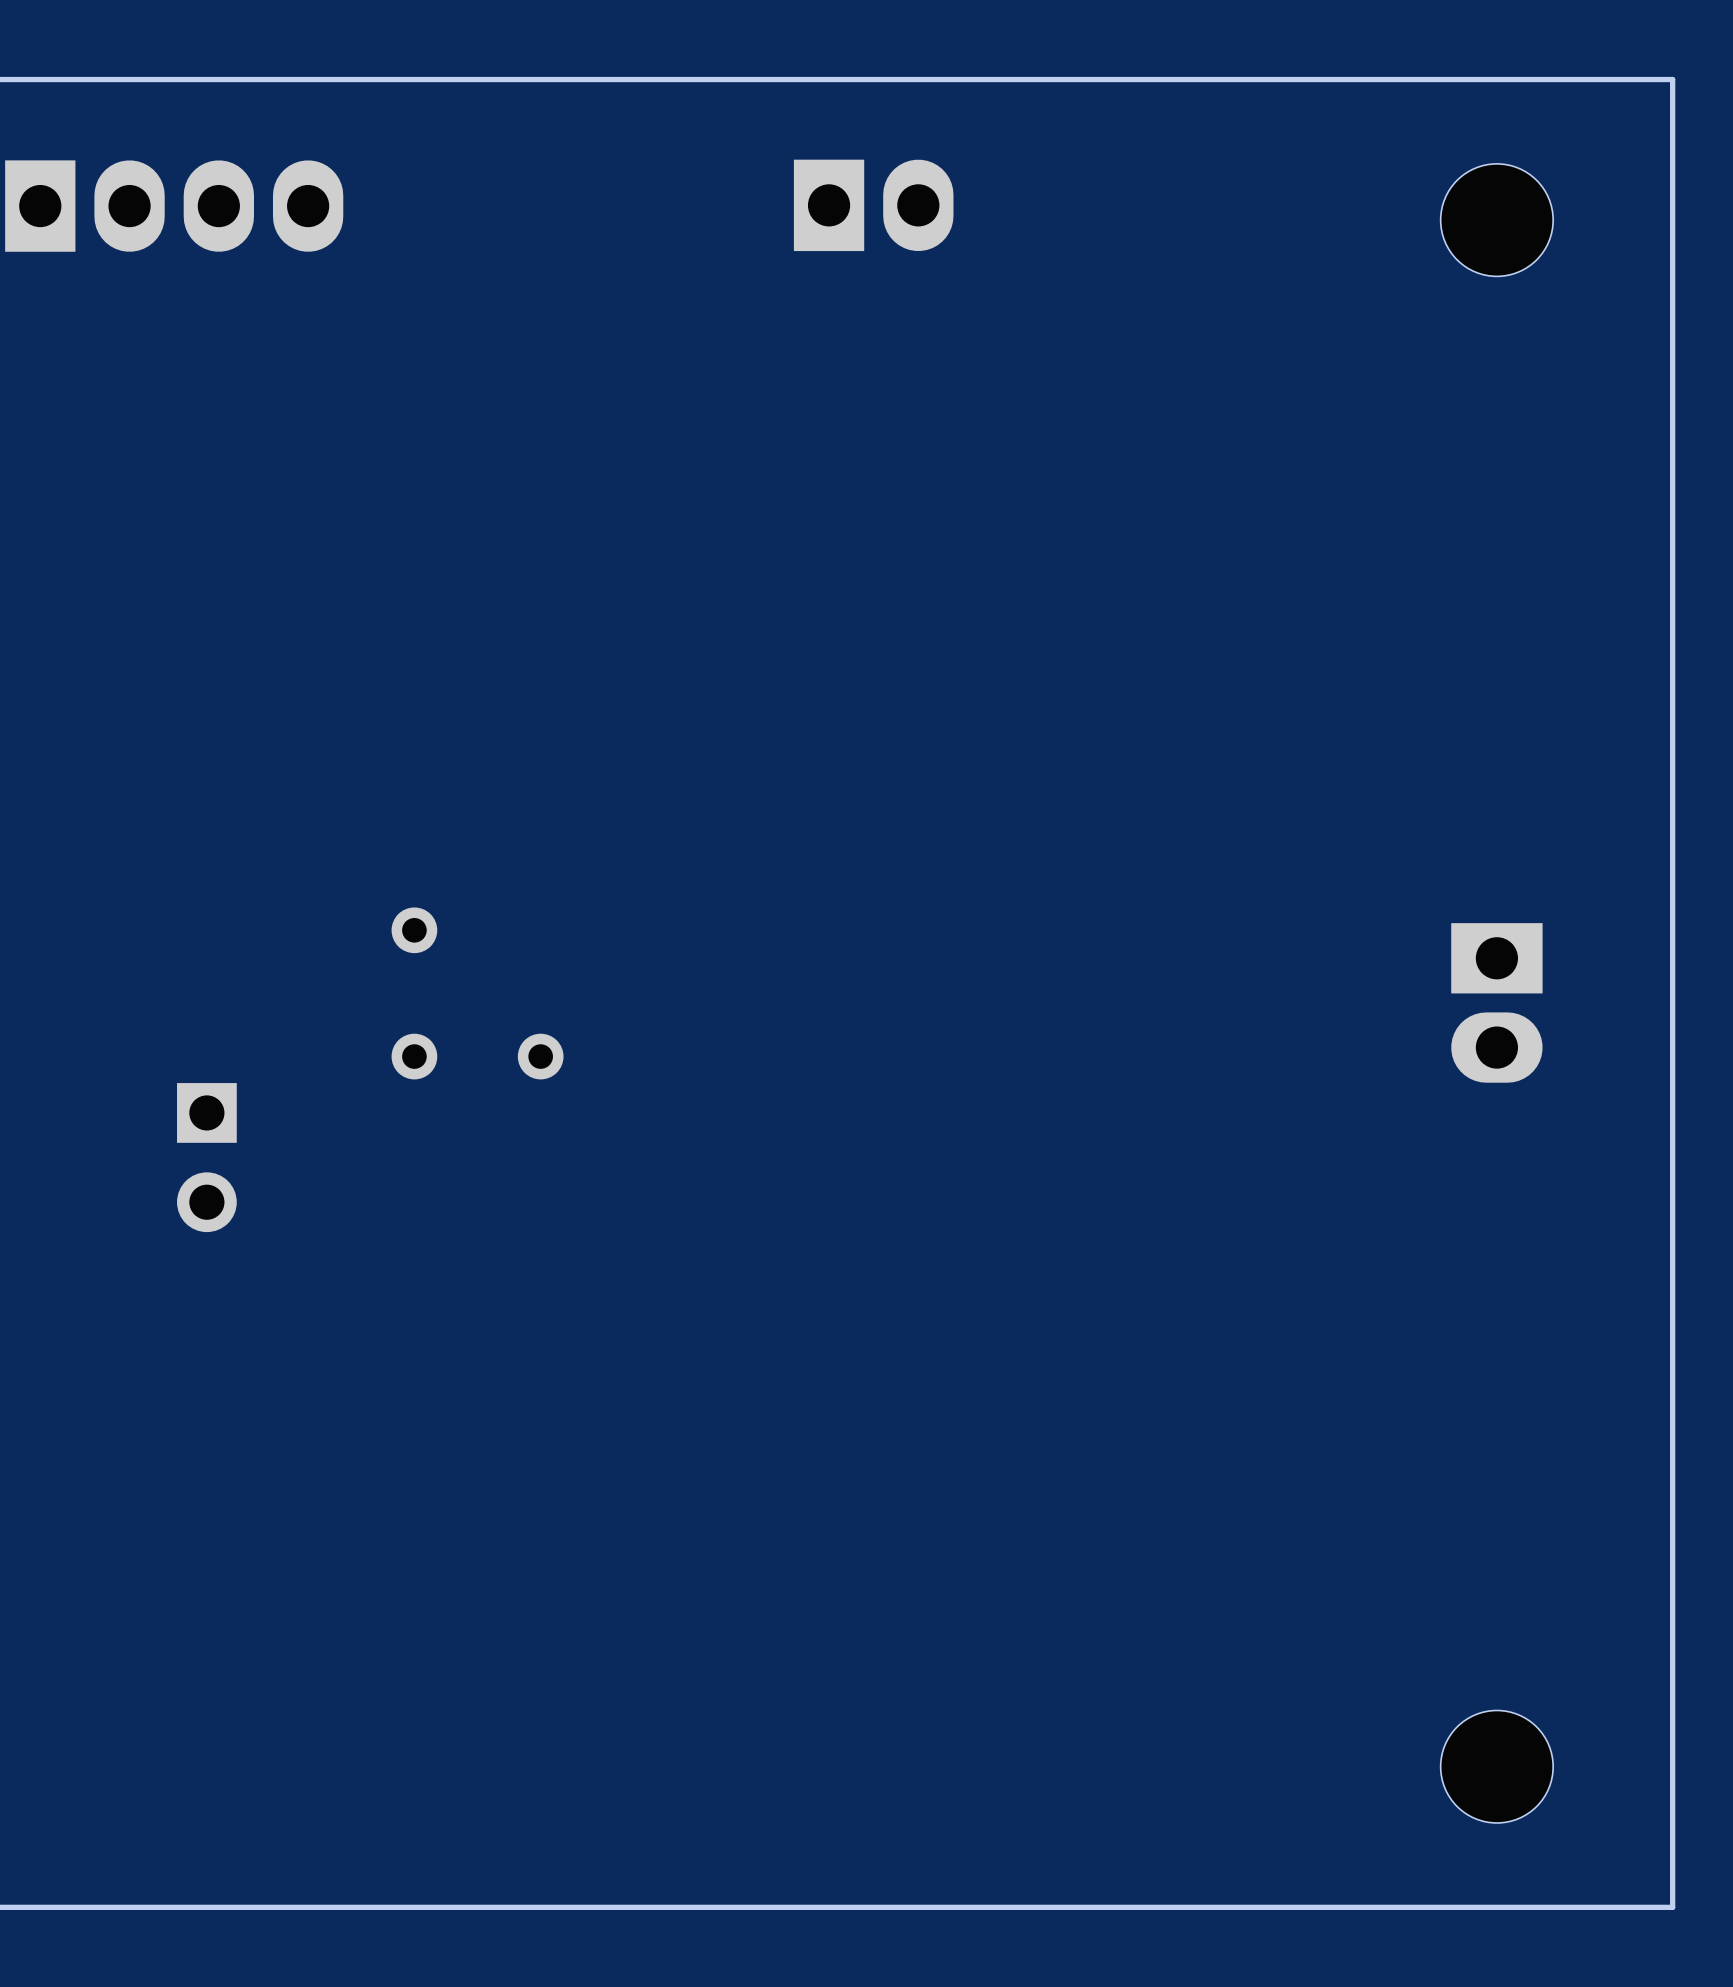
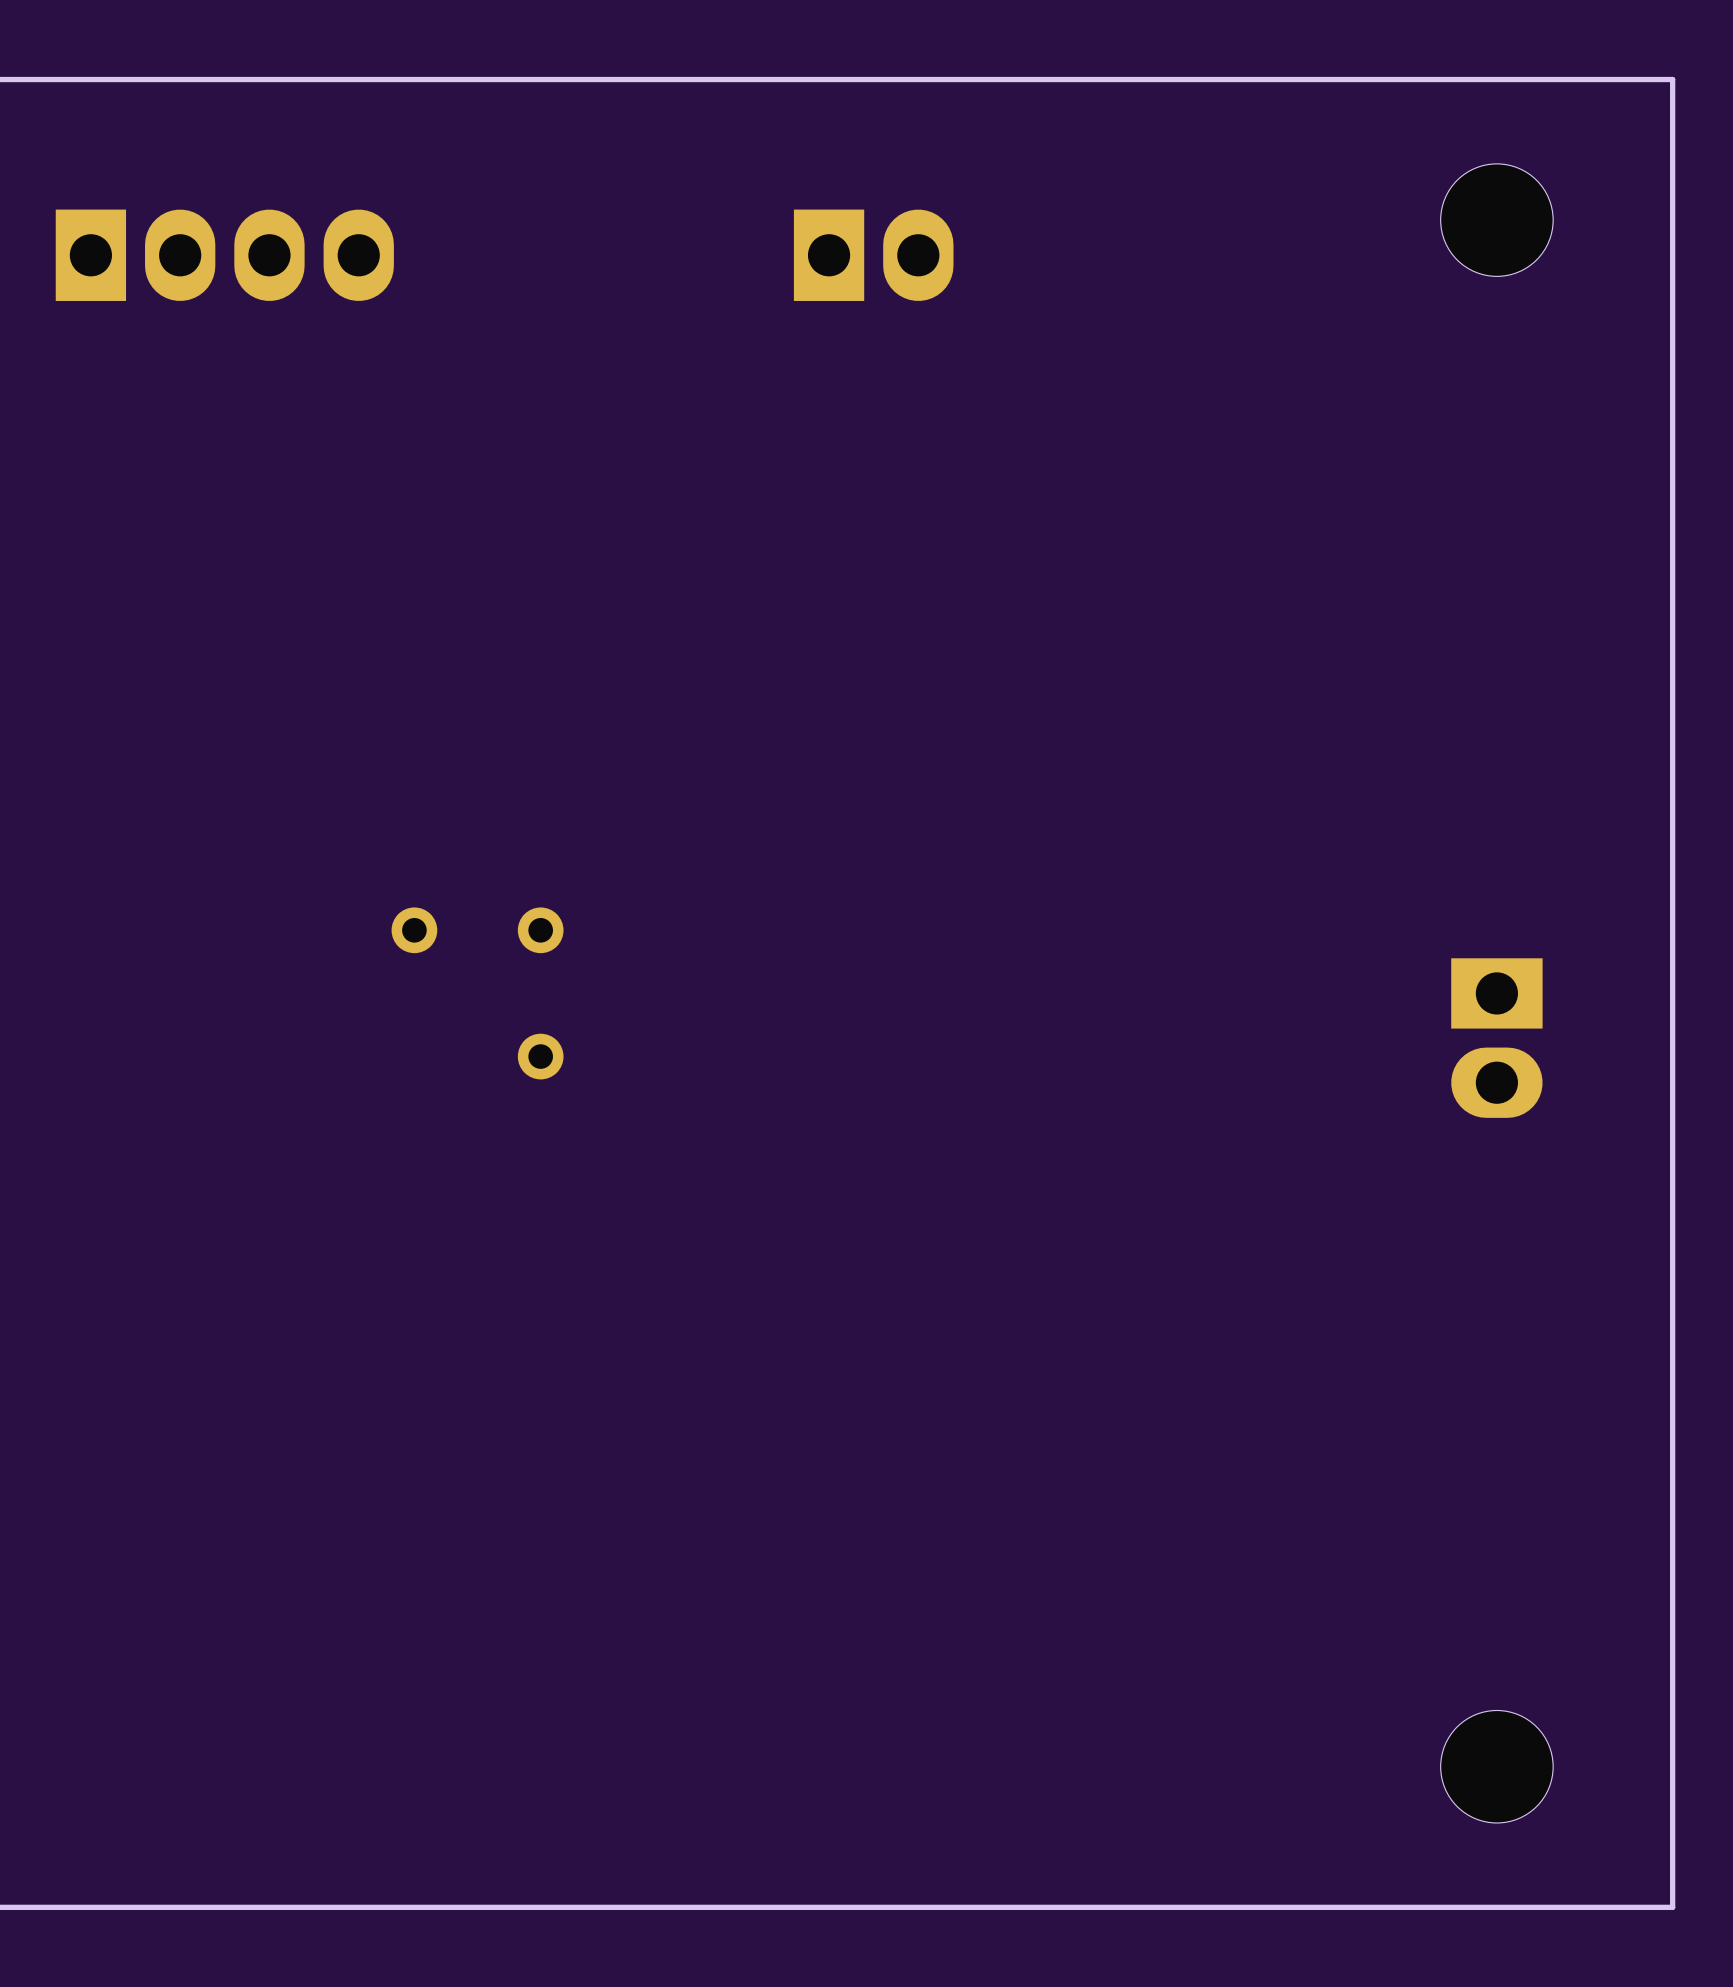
part position: (873, 205) -> (873, 255)
part position: (174, 206) -> (224, 255)
part rotation: 0° (477, 993) -> 180° (477, 993)
part position: (1496, 1002) -> (1496, 1038)
part: (206, 1157) -> none

